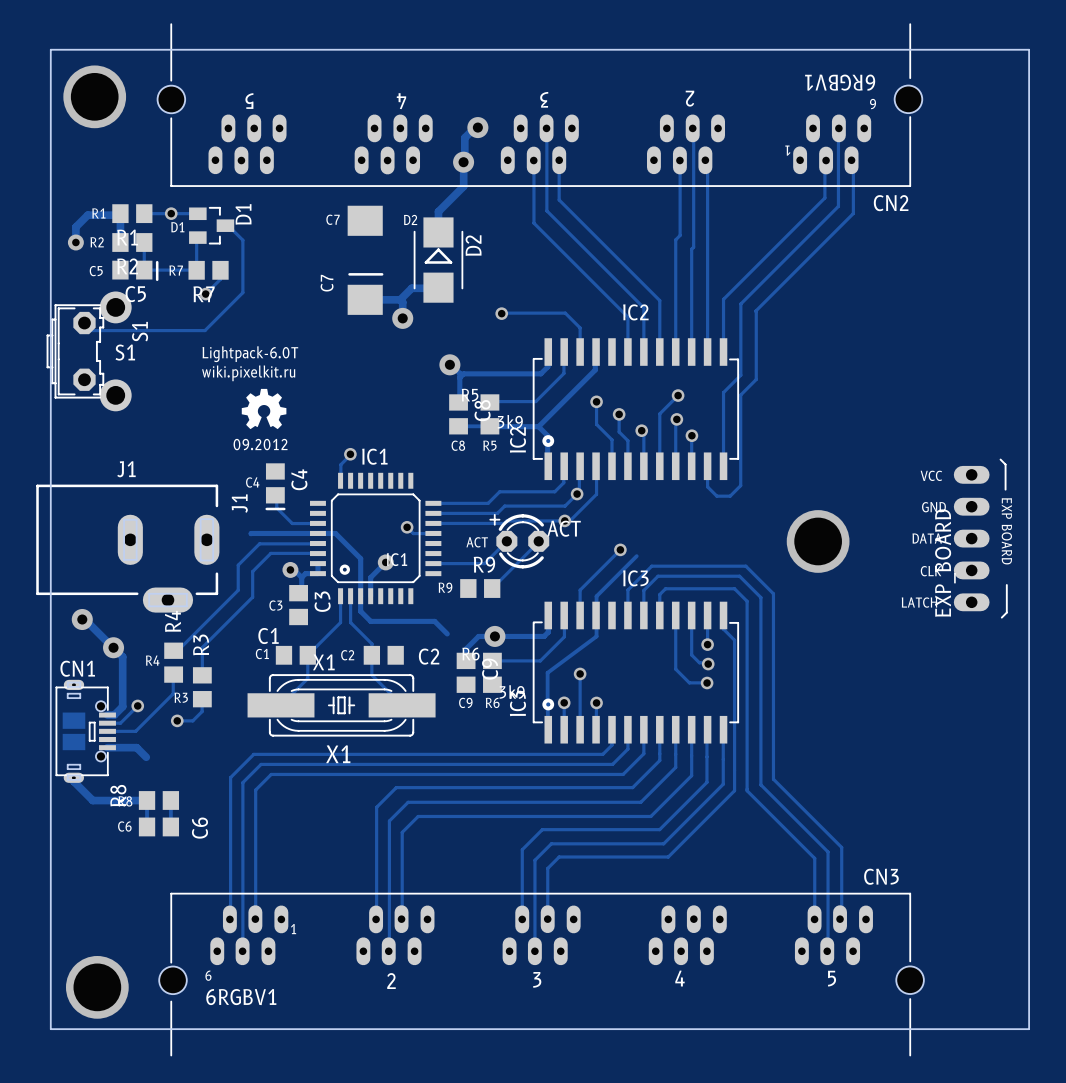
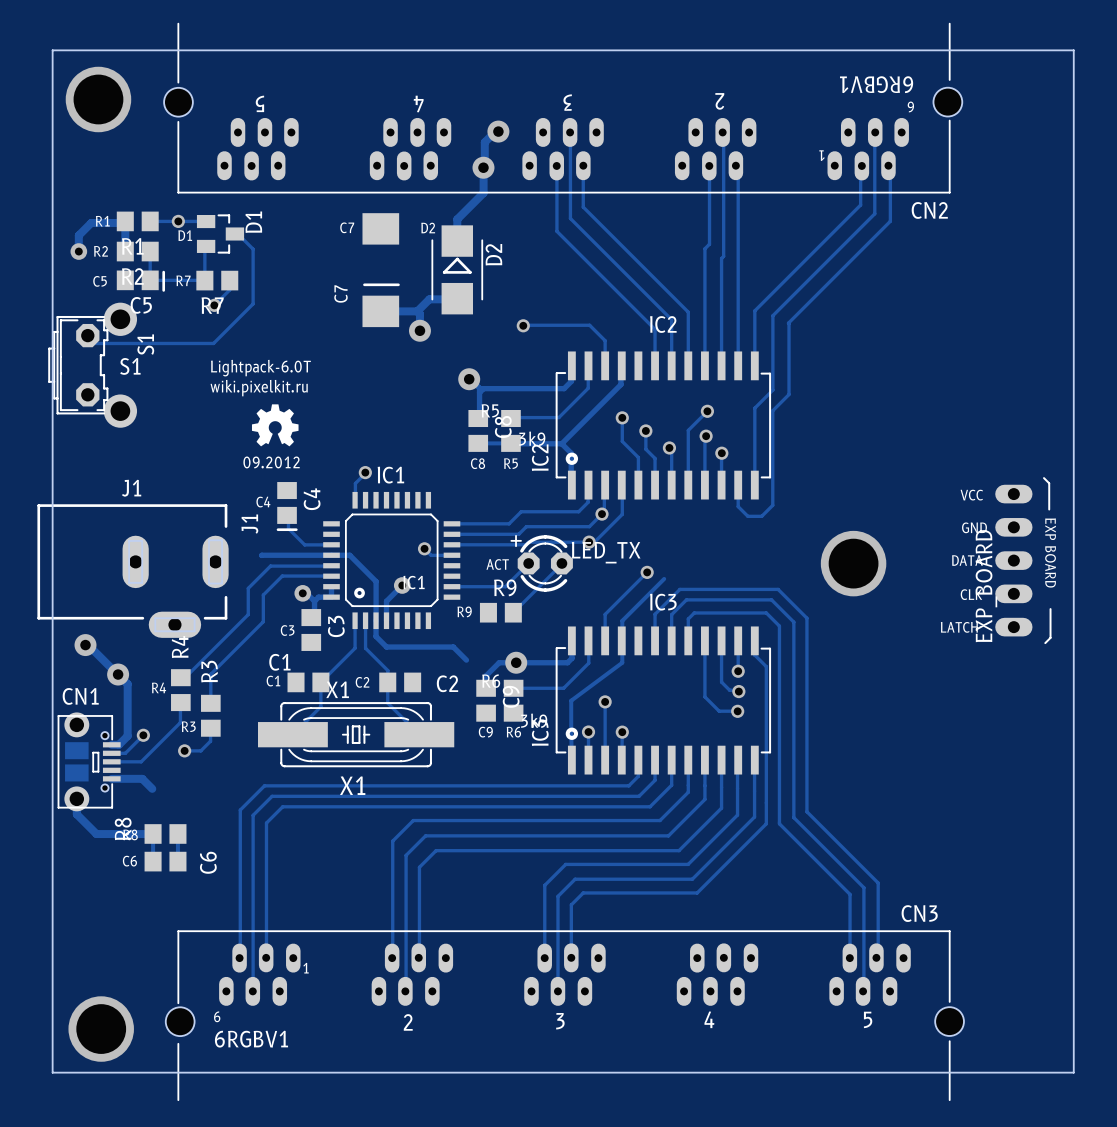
ACT name: ACT (564, 528) -> LED_TX (606, 552)
part footprint: [55, 679, 116, 783] -> [57, 712, 121, 812]

